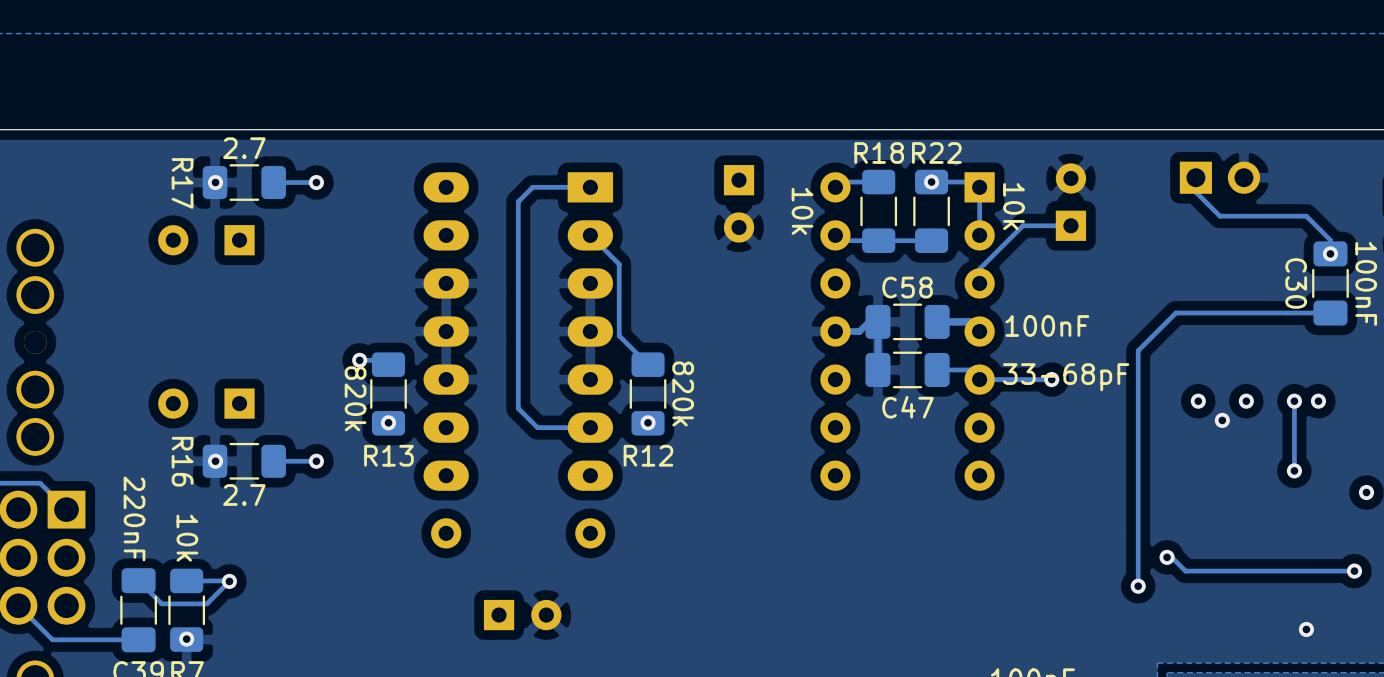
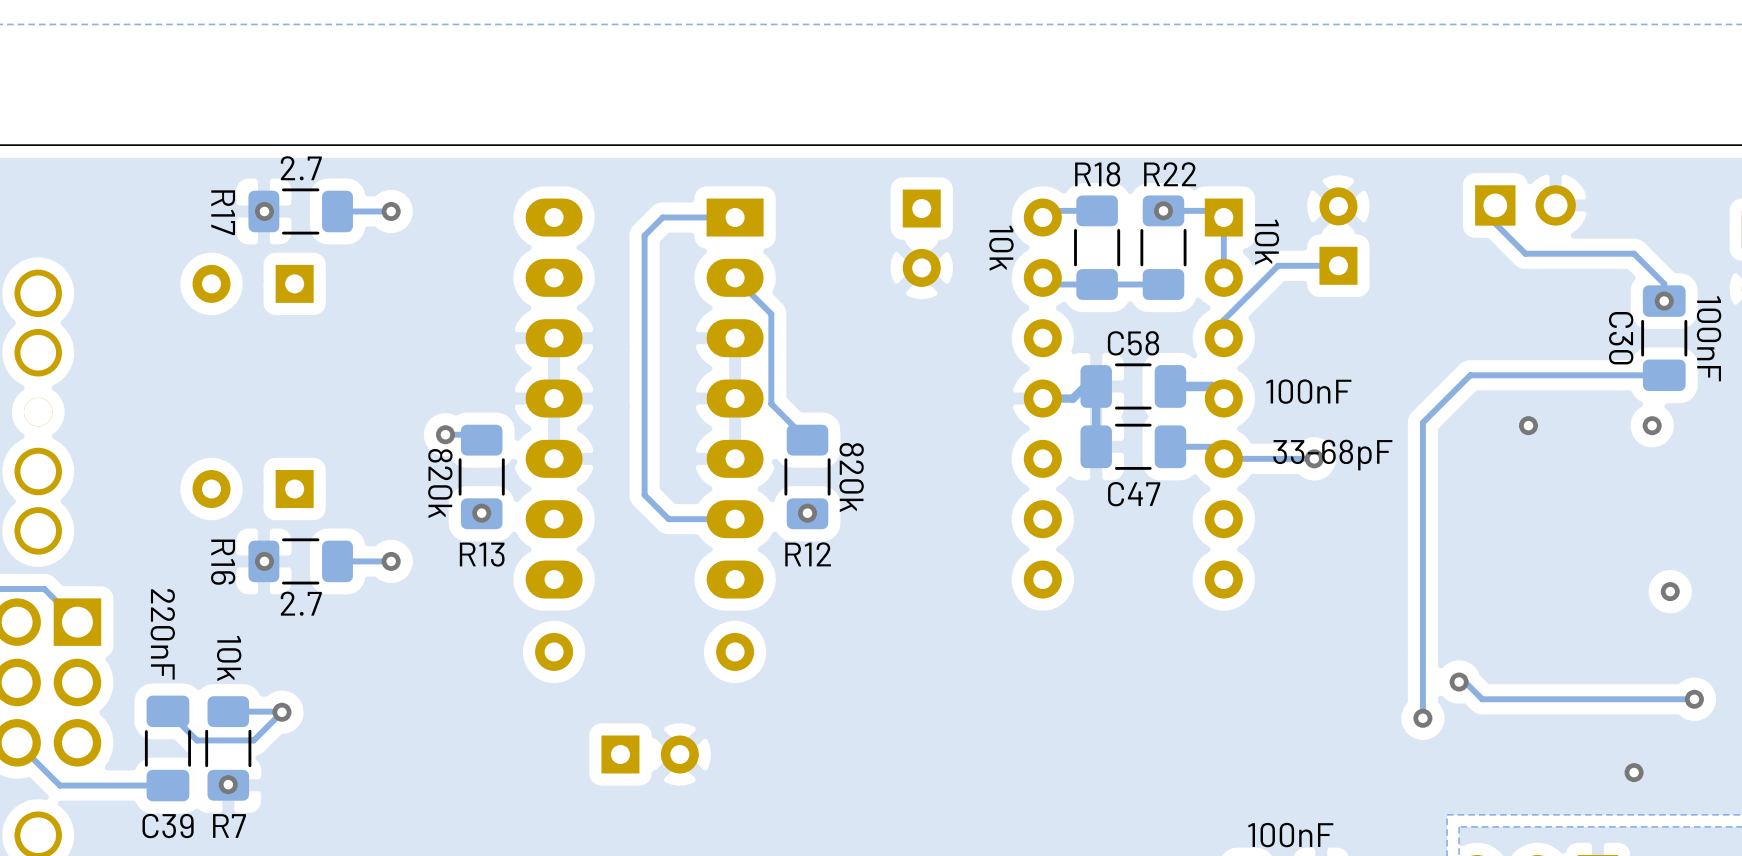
via: none -> (1528, 425)
via: none -> (1652, 425)
via: (1198, 401) -> none
via: (1246, 401) -> none
track: (1294, 401) (1294, 470) -> none
via: (1294, 401) -> none
via: (1318, 401) -> none
via: (1222, 420) -> none
via: (1294, 470) -> none
via: none -> (1670, 591)
via: (1366, 492) -> none

